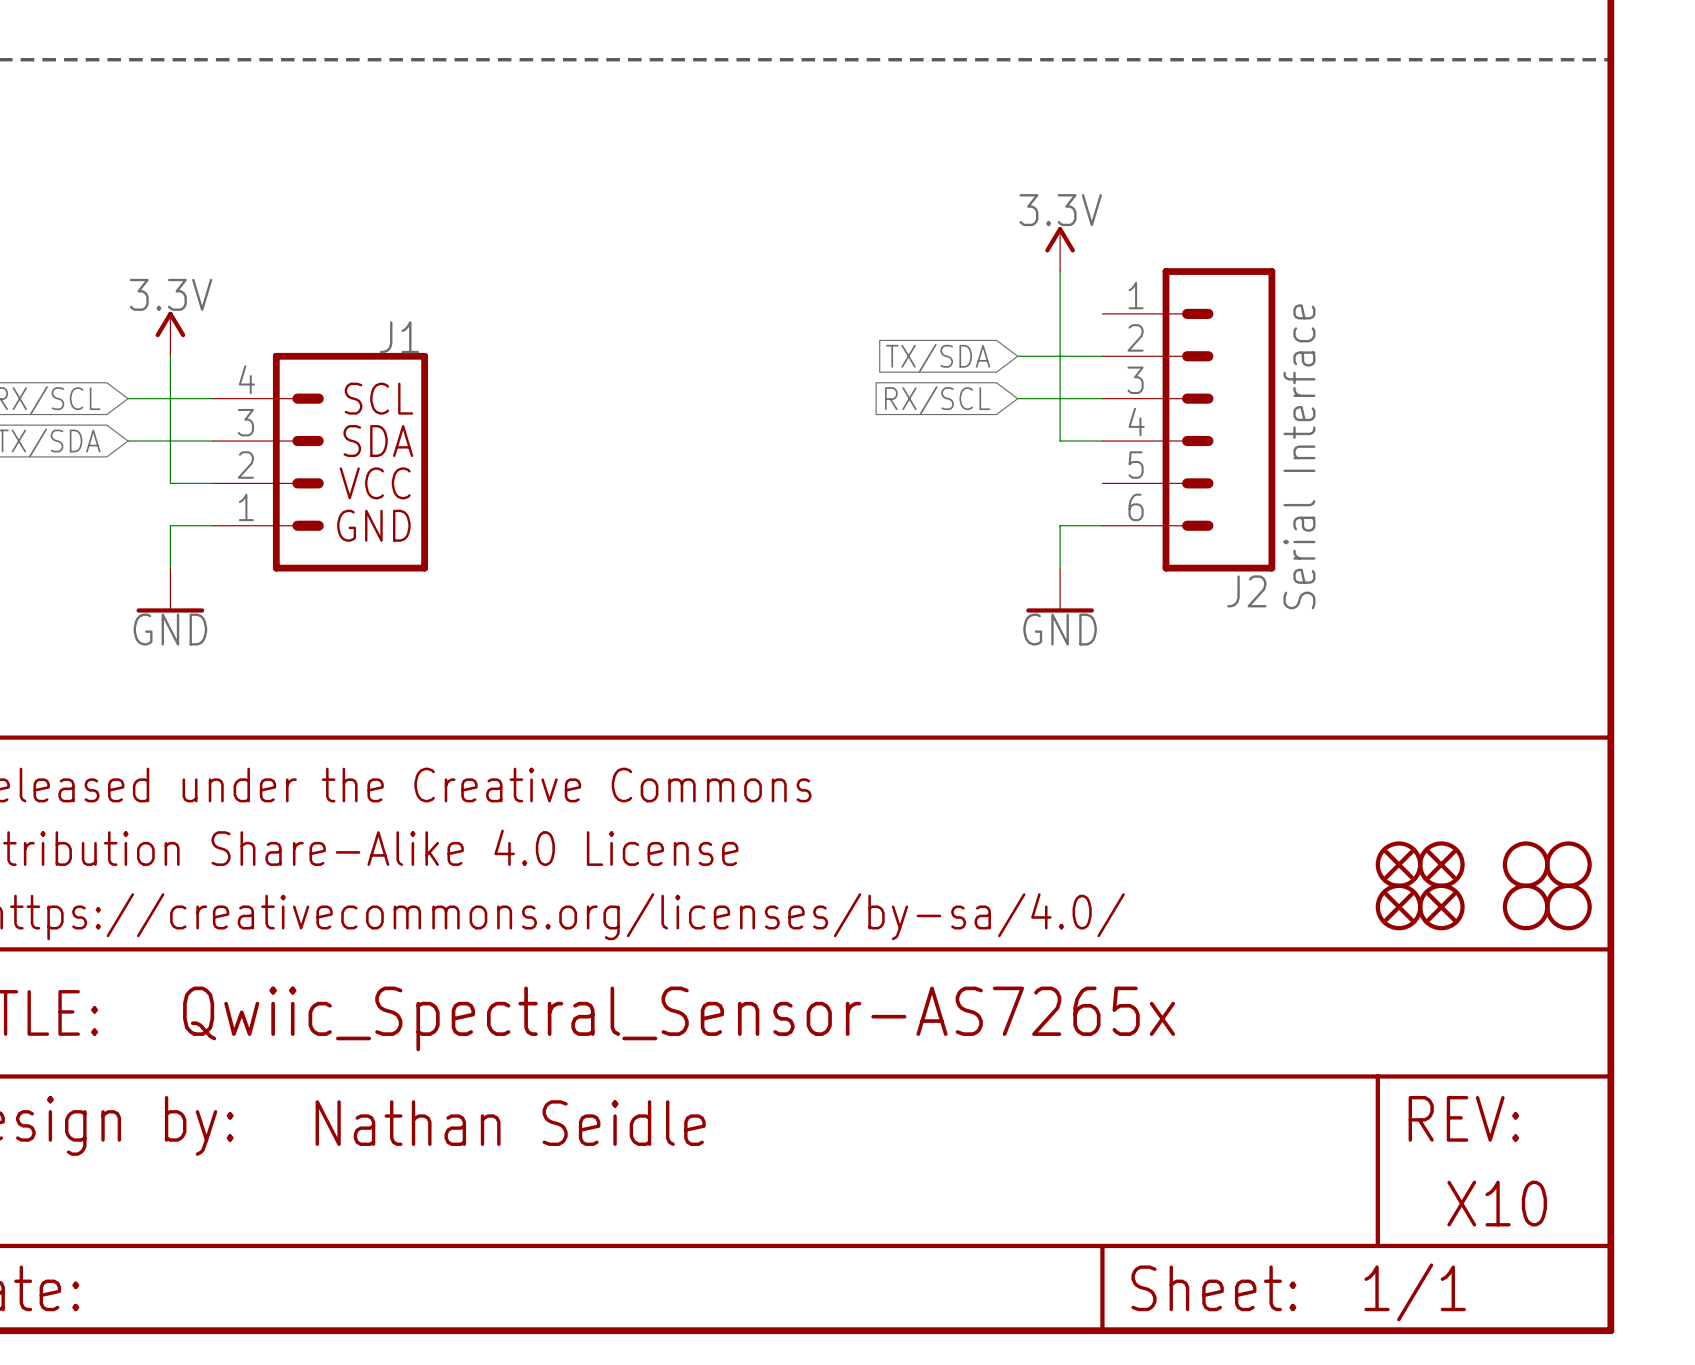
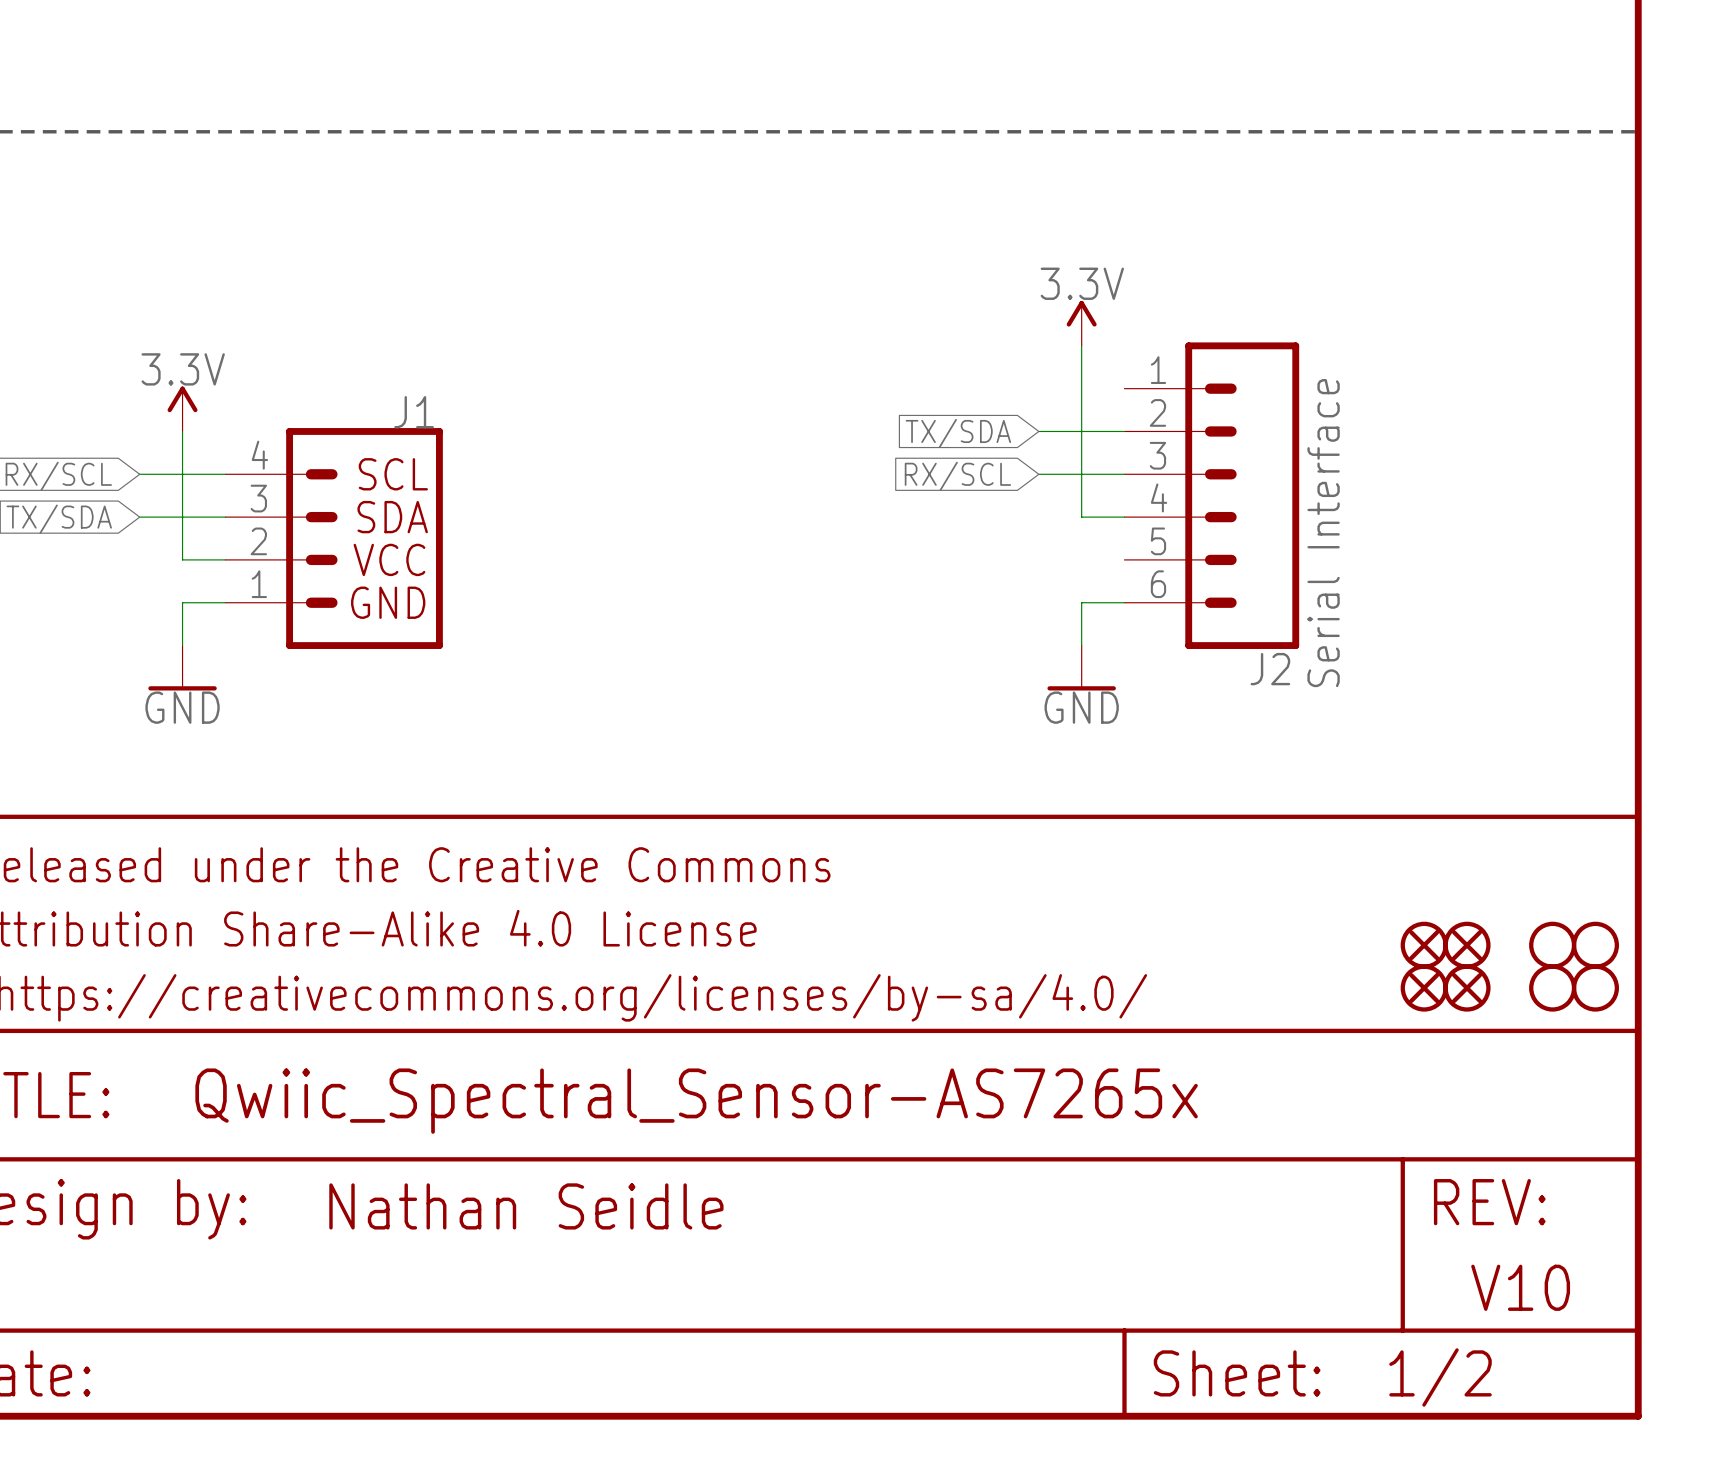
text: X10 (1497, 1203) -> V10 (1520, 1287)
part text: 1/1 (1415, 1292) -> 1/2 (1440, 1377)

